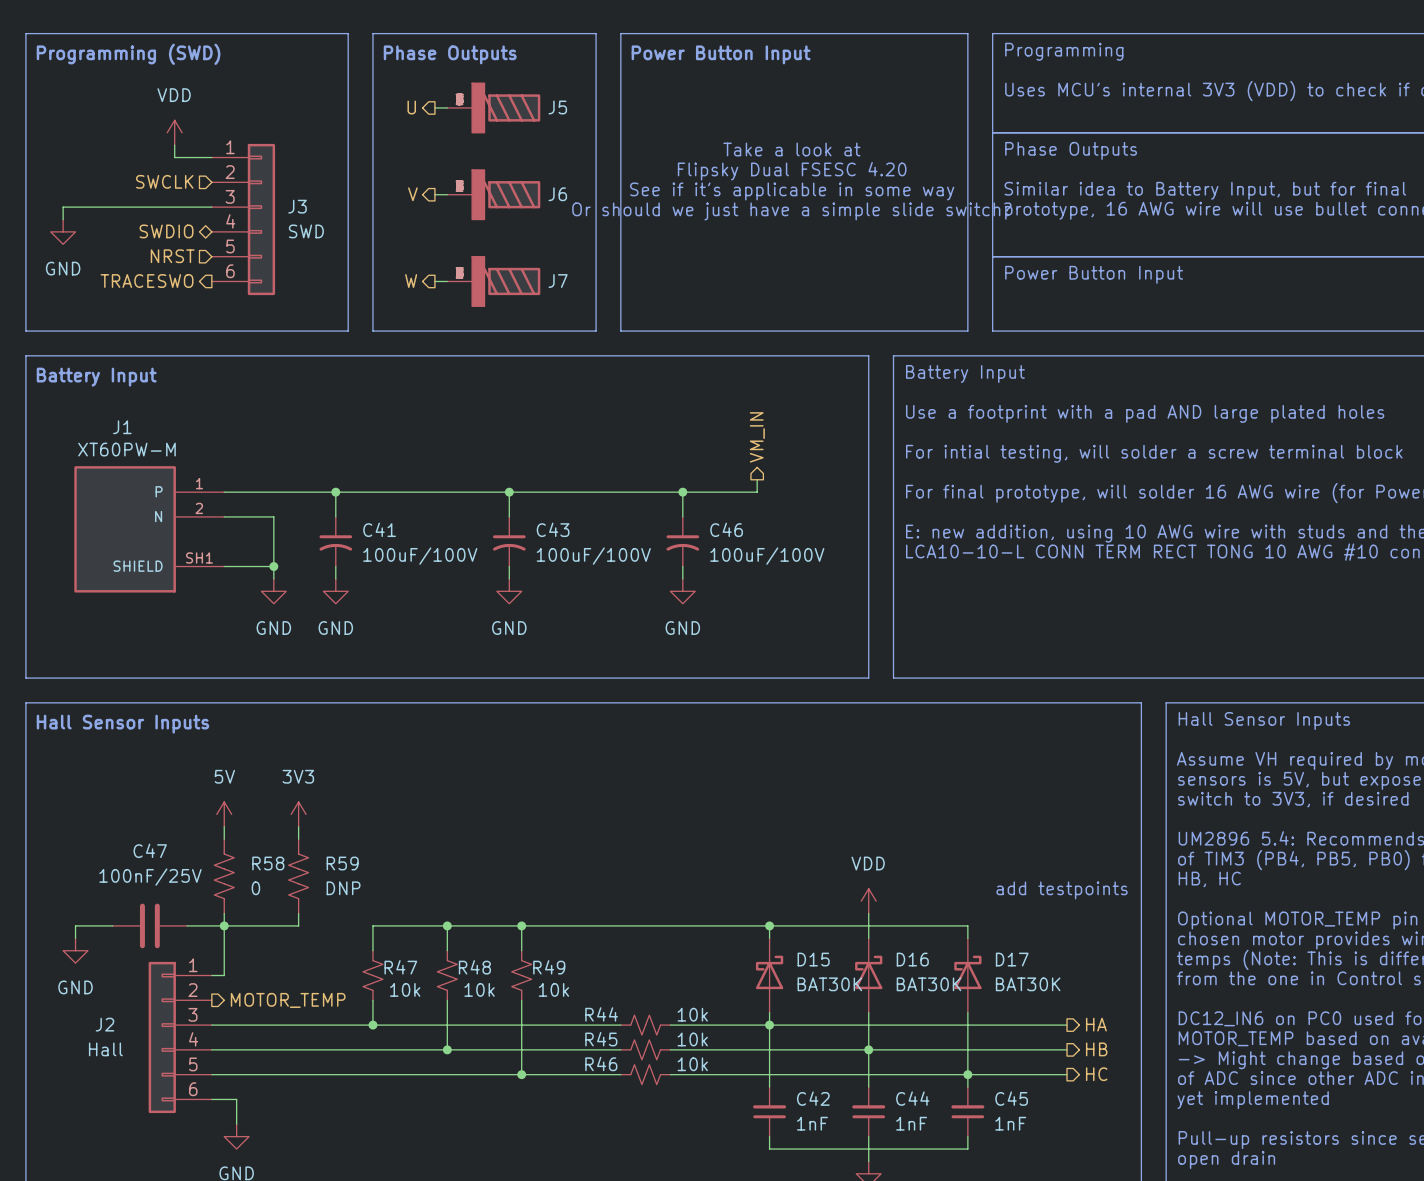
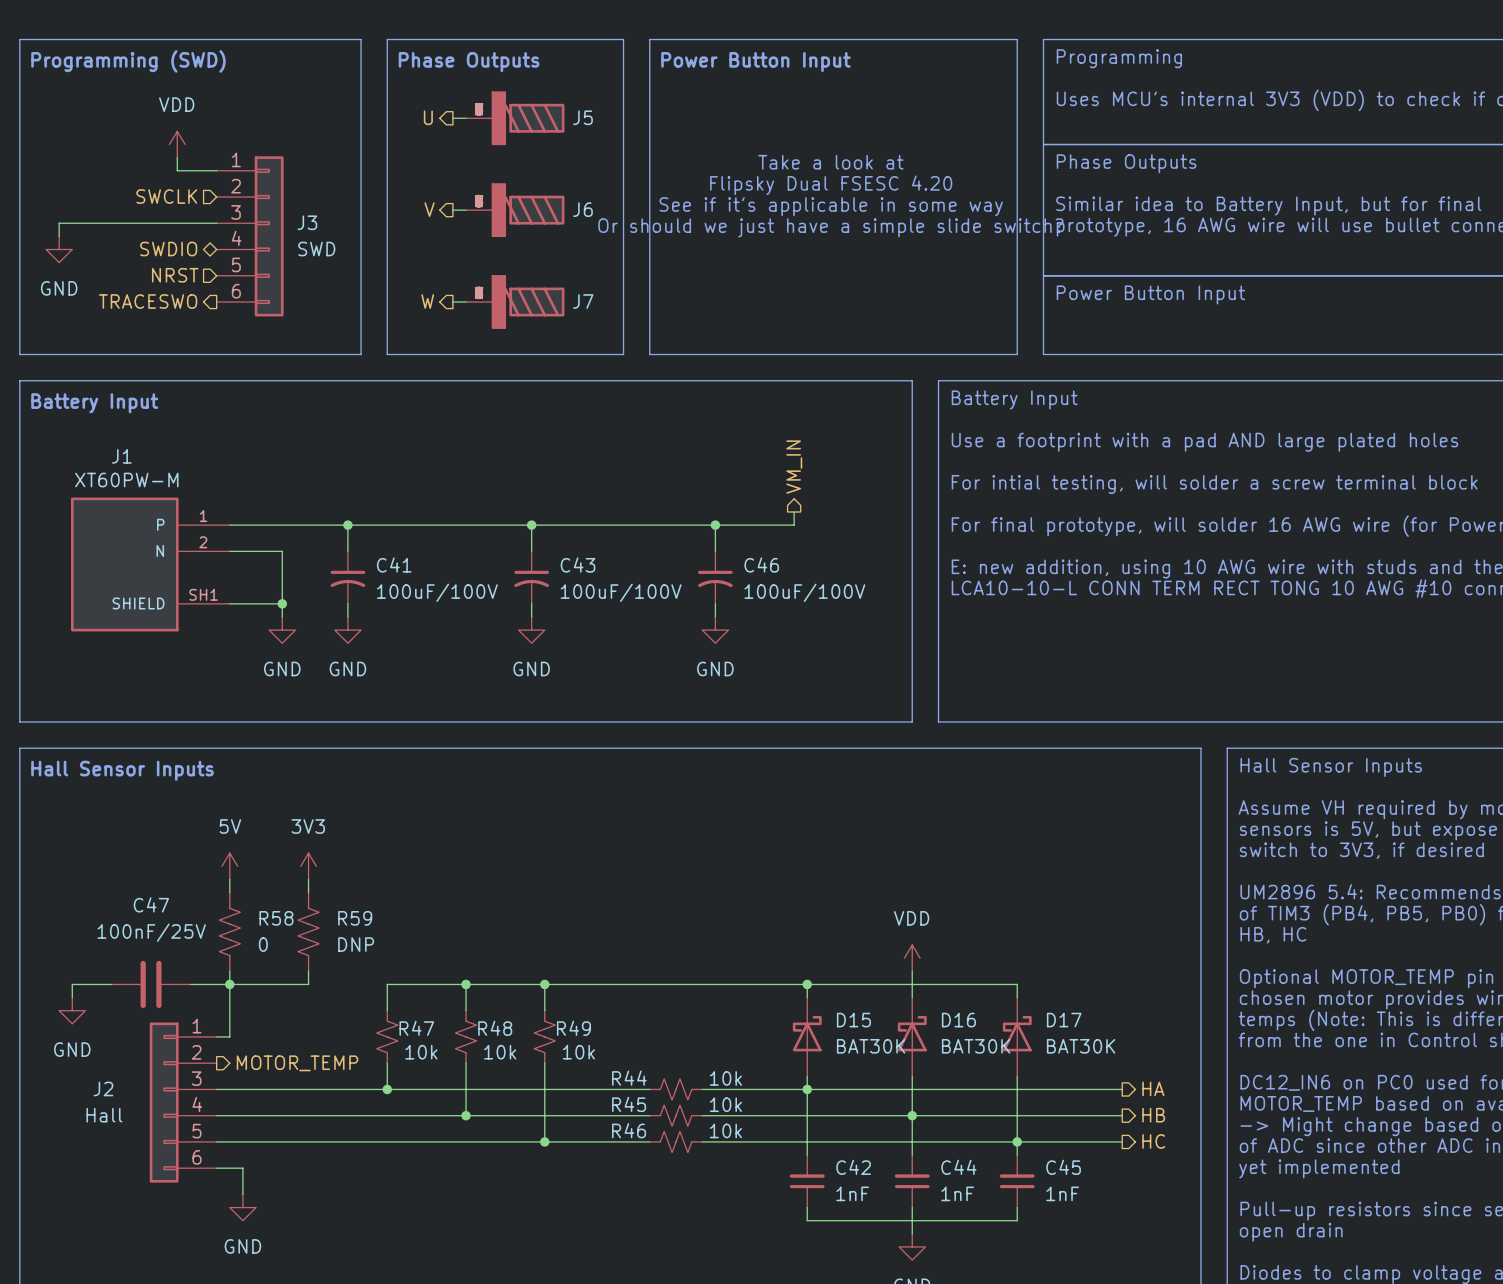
text: add testpoints (1062, 890) -> none

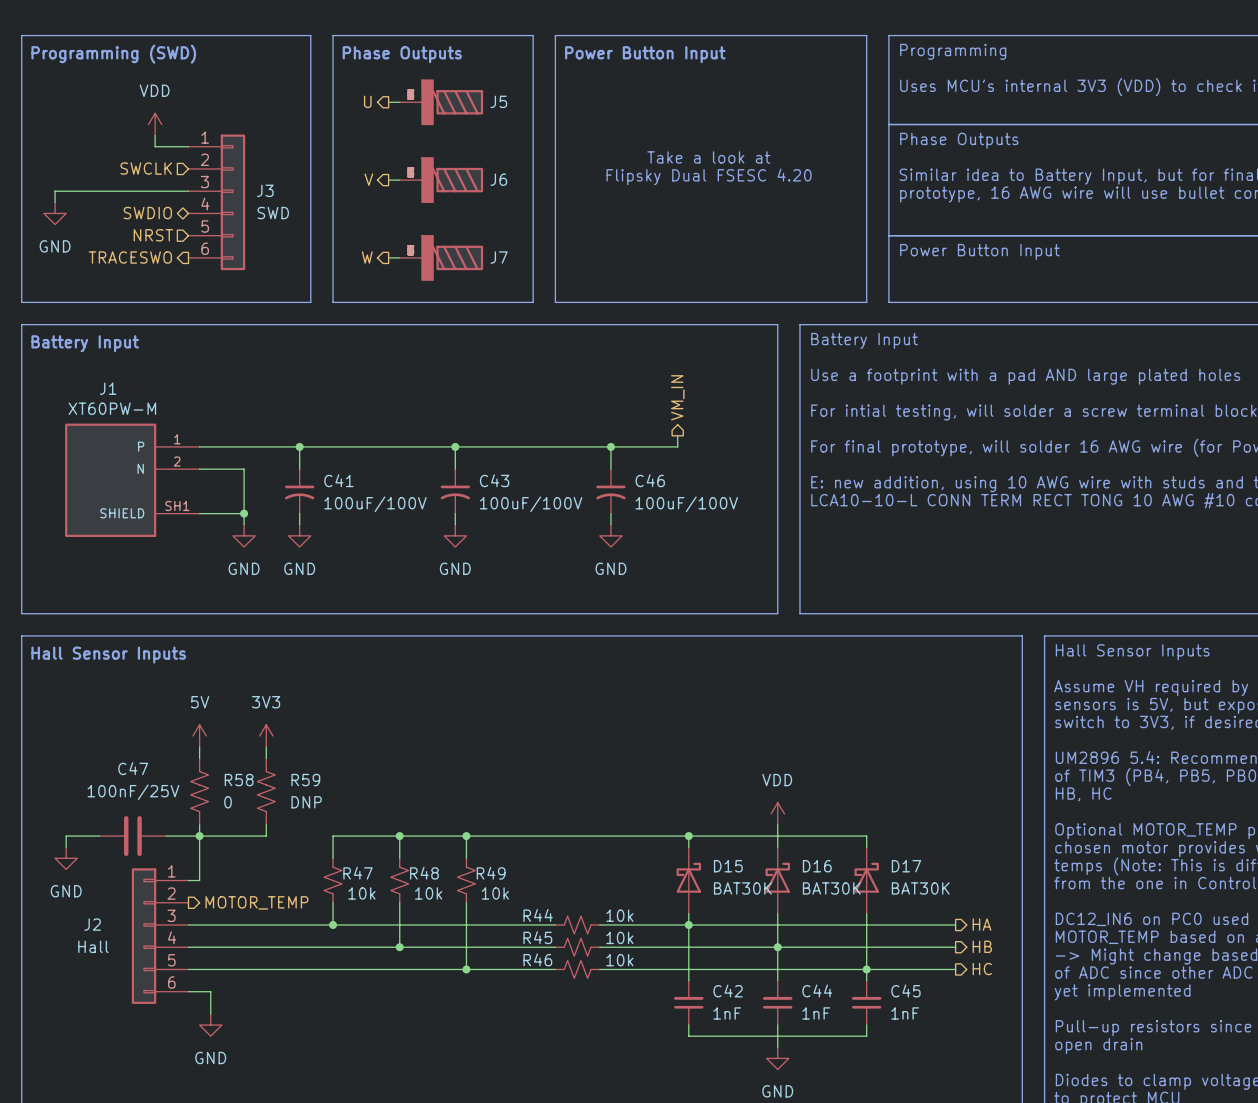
text: Take a look at (830, 162) -> none
text: Flipsky Dual FSESC 4.20 (831, 185) -> Take a look at (708, 157)
text: See if it's applicable in some way (831, 206) -> Flipsky Dual FSESC 4.20 (709, 176)
text: Or should we just have a simple slide switch? (830, 227) -> none

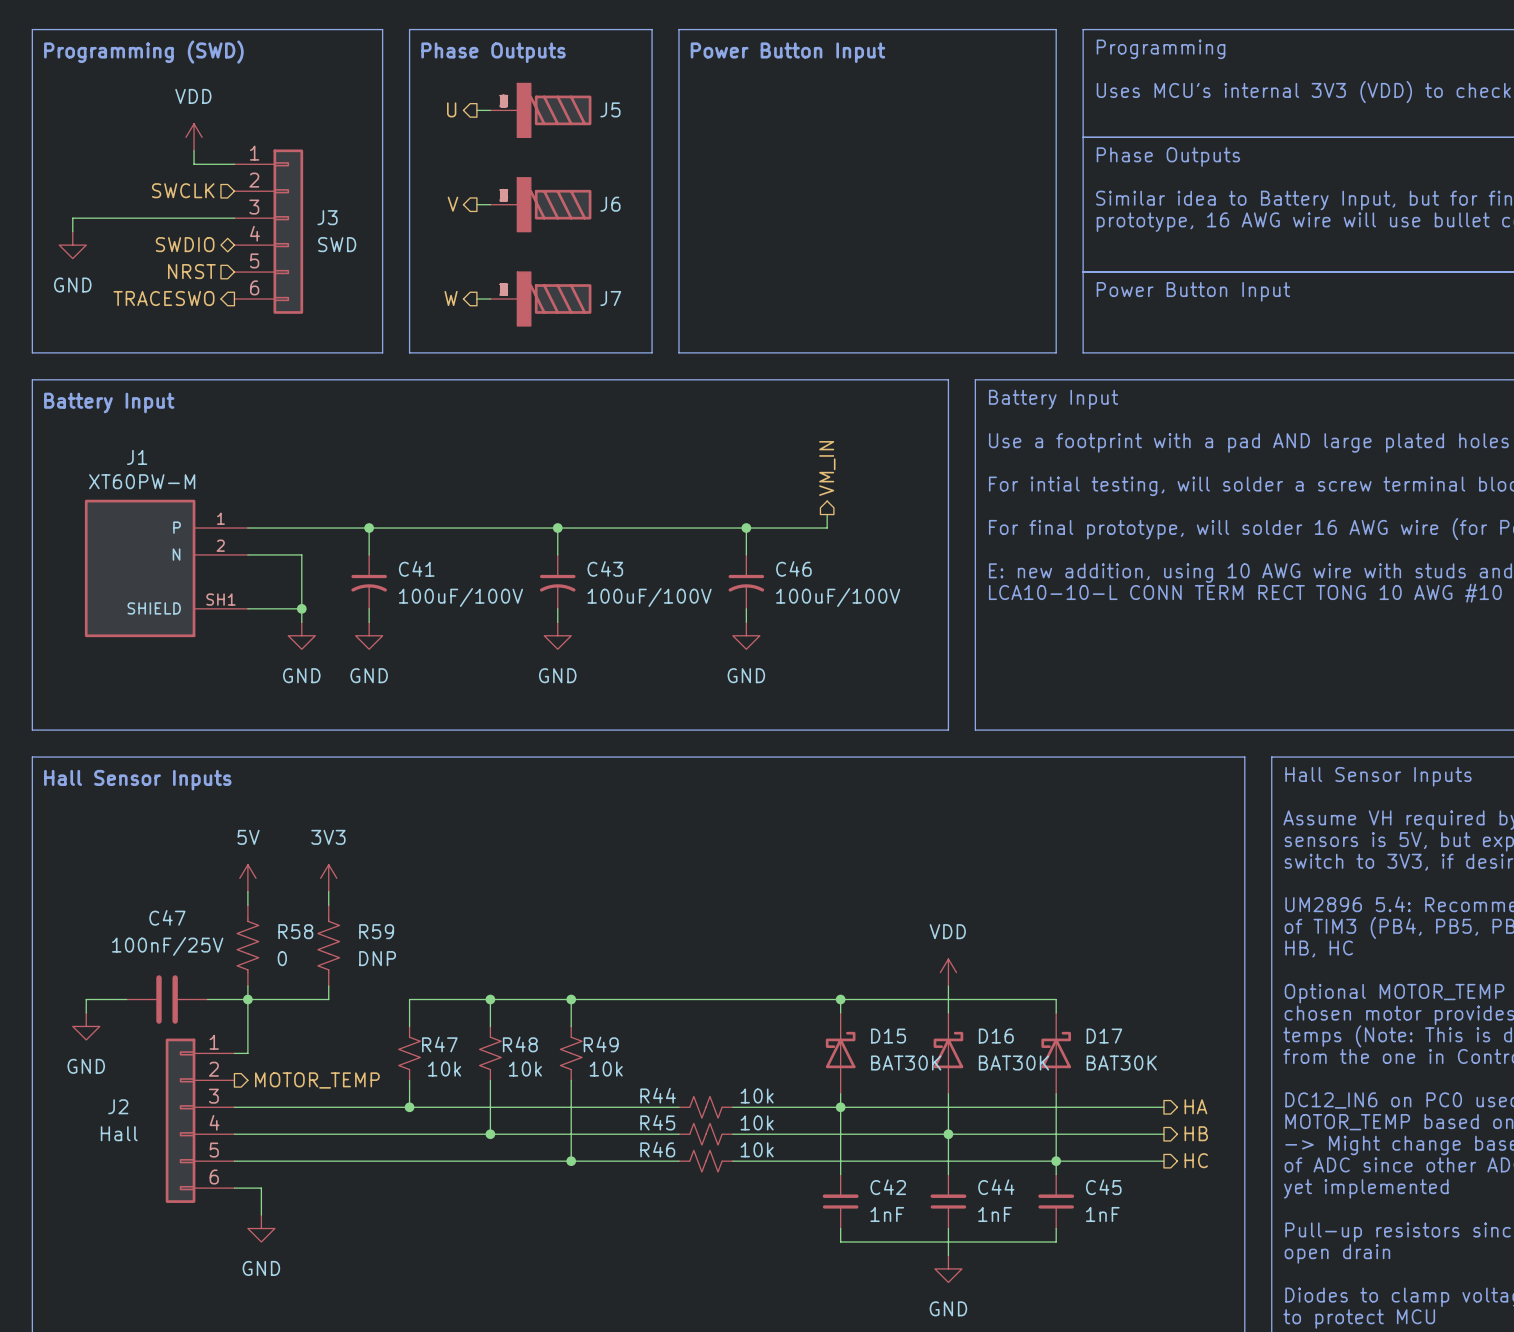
text: Take a look at (708, 157) -> none
text: Flipsky Dual FSESC 4.20 (709, 176) -> none

